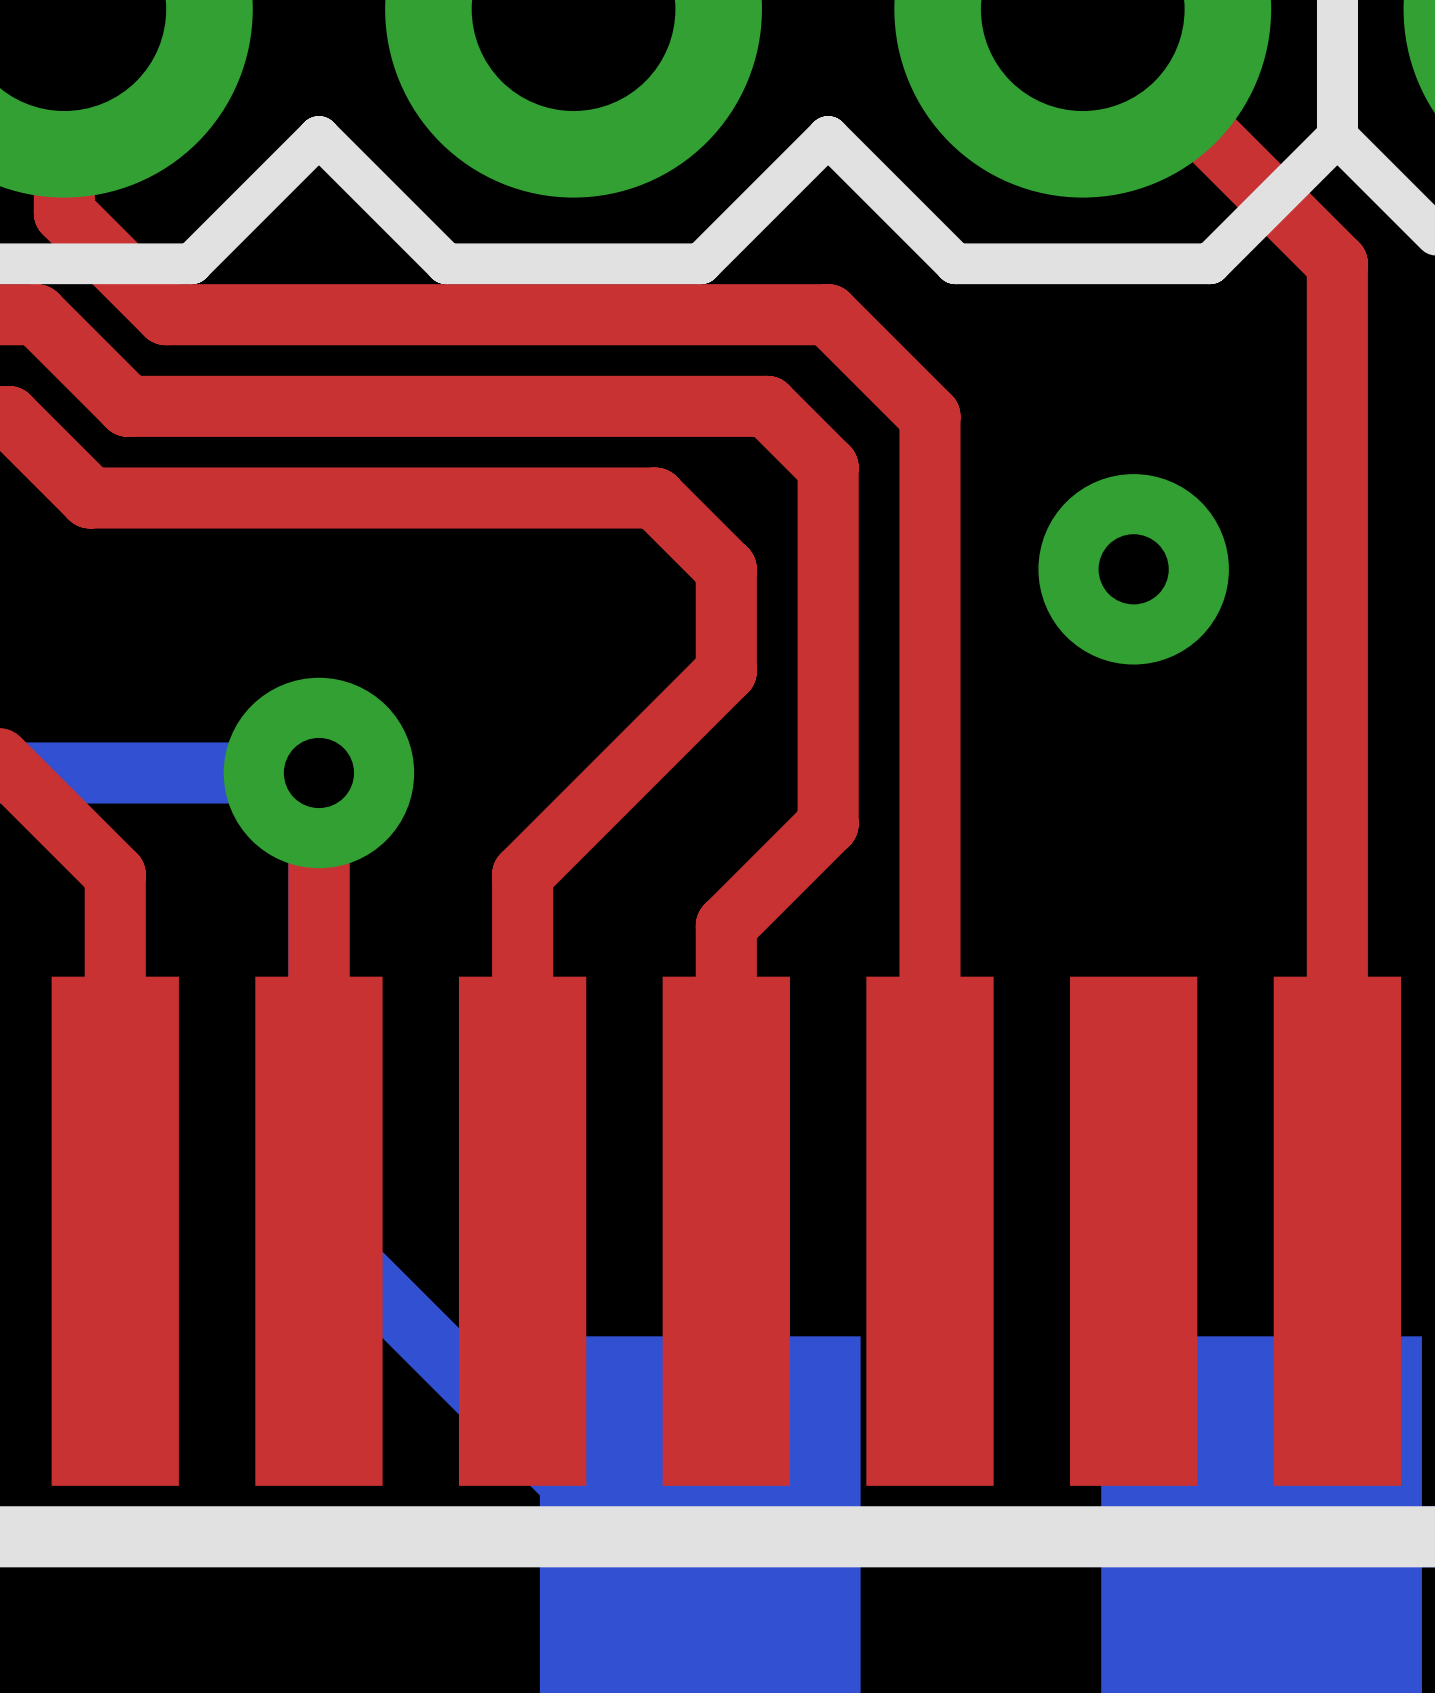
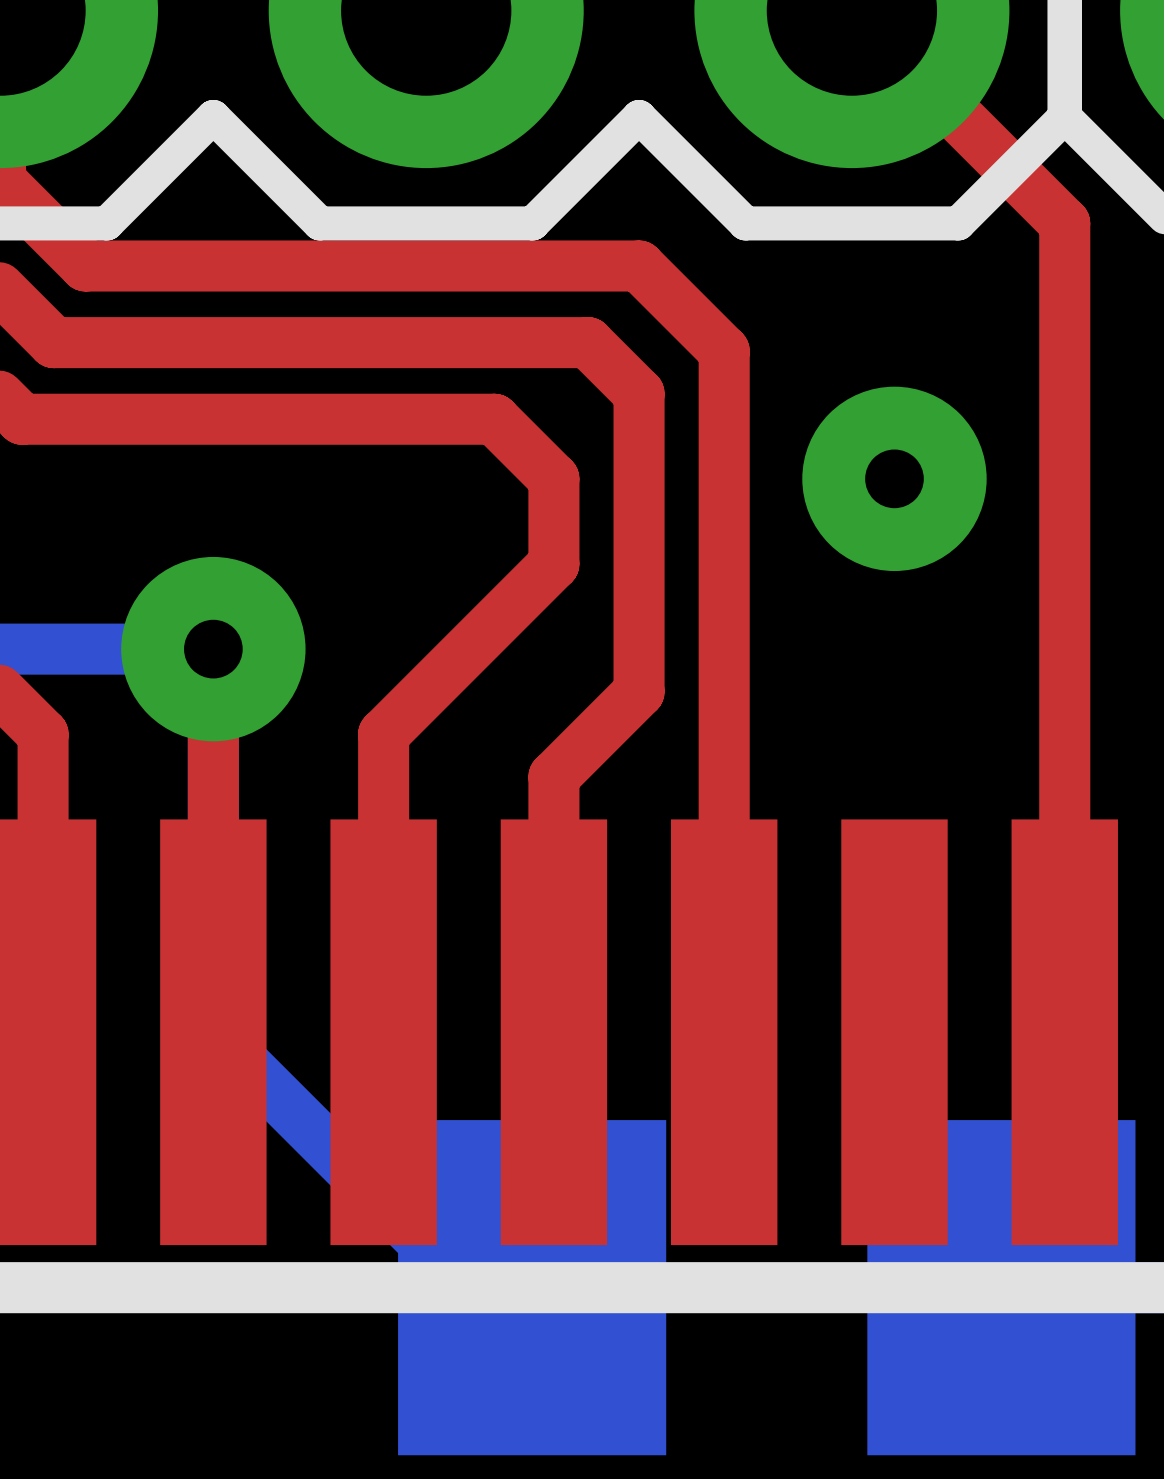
via size: [1038, 474, 1229, 665] -> [802, 386, 987, 572]
via size: [223, 677, 415, 869] -> [121, 556, 306, 742]

